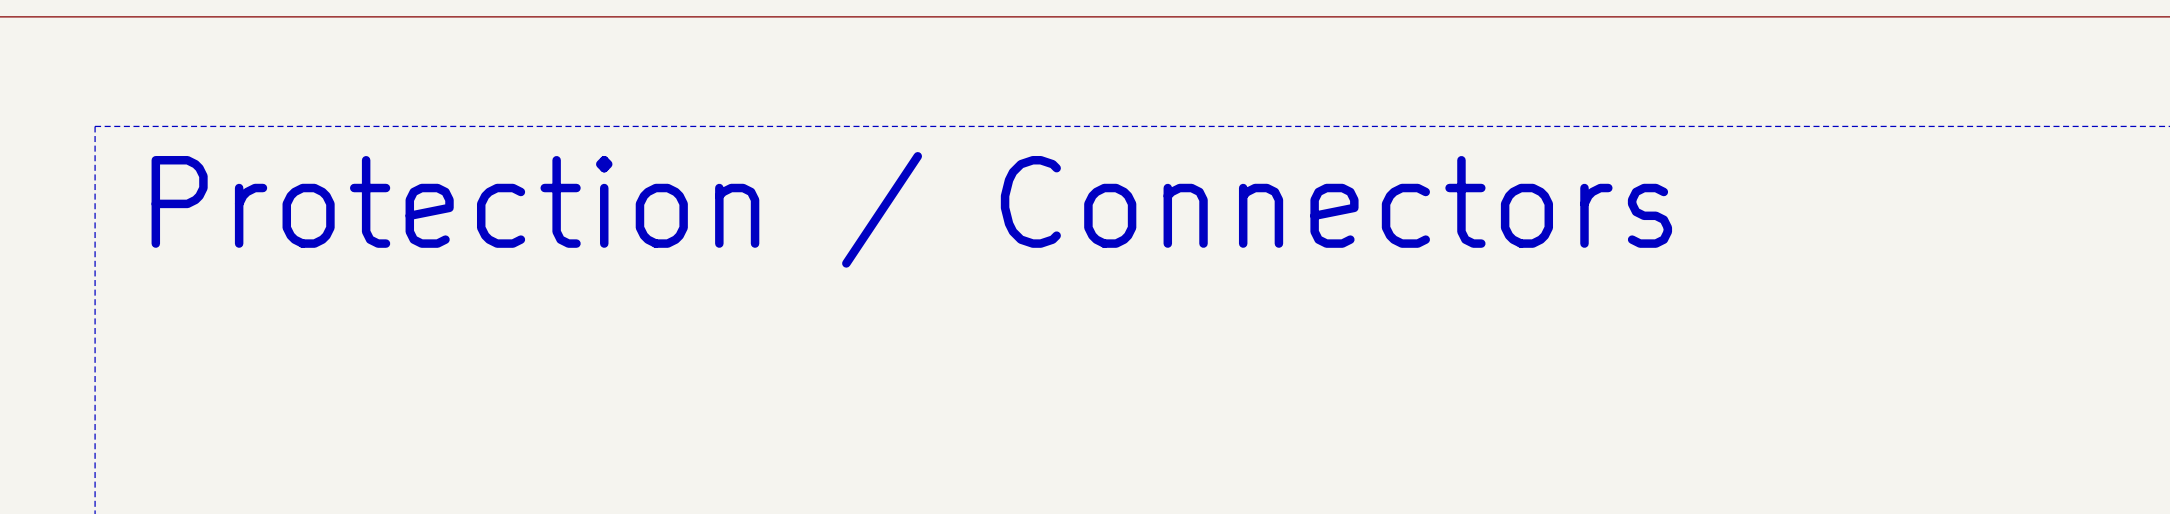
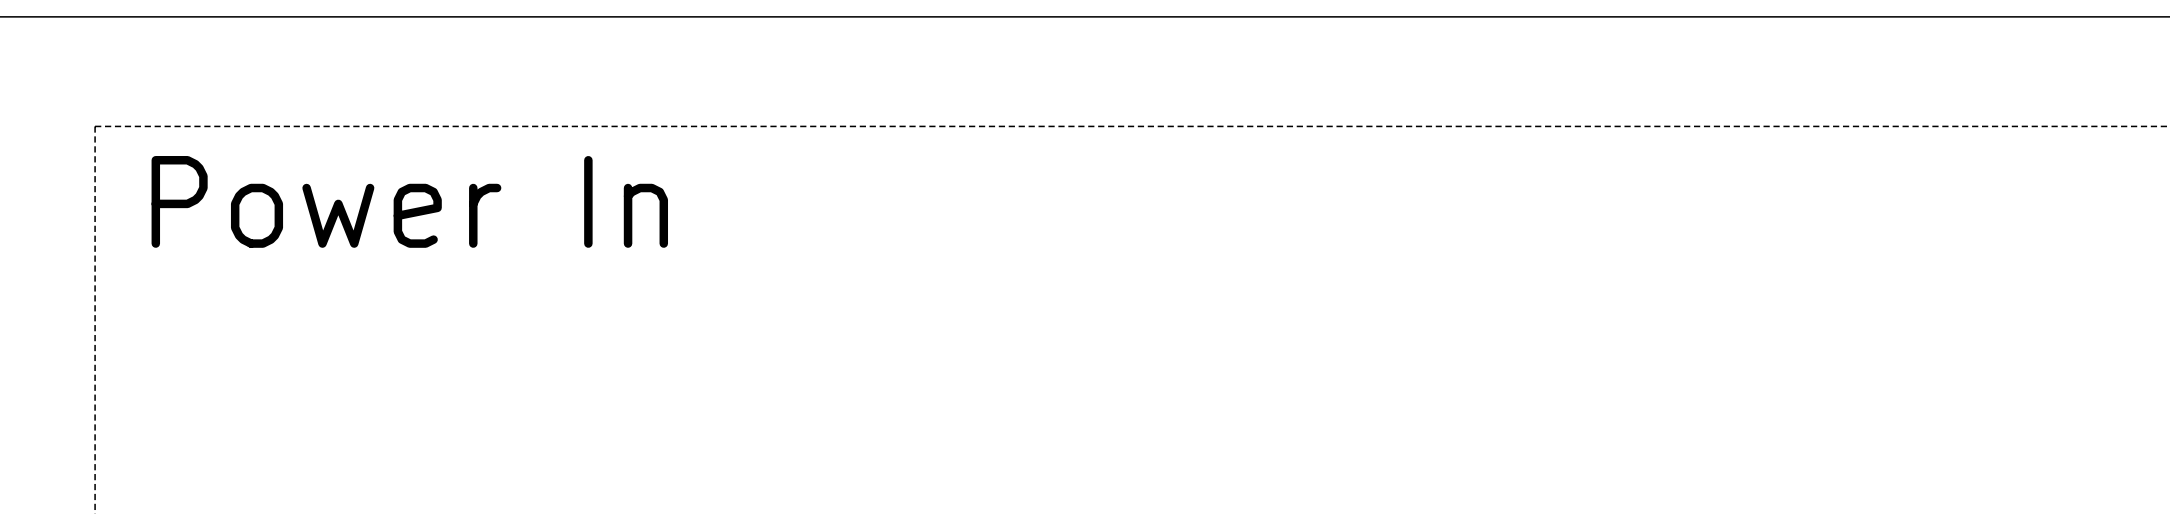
text: Protection / Connectors (911, 209) -> Power In (409, 201)

